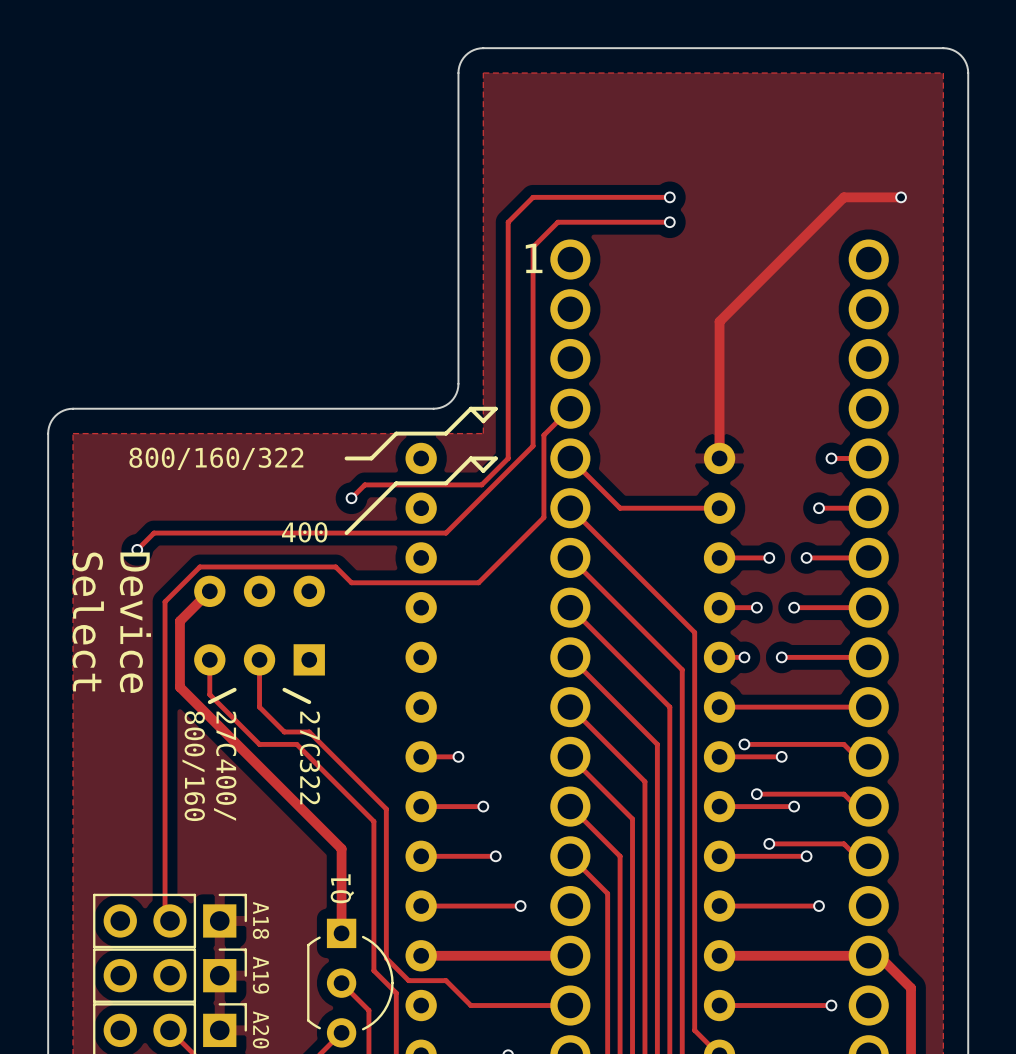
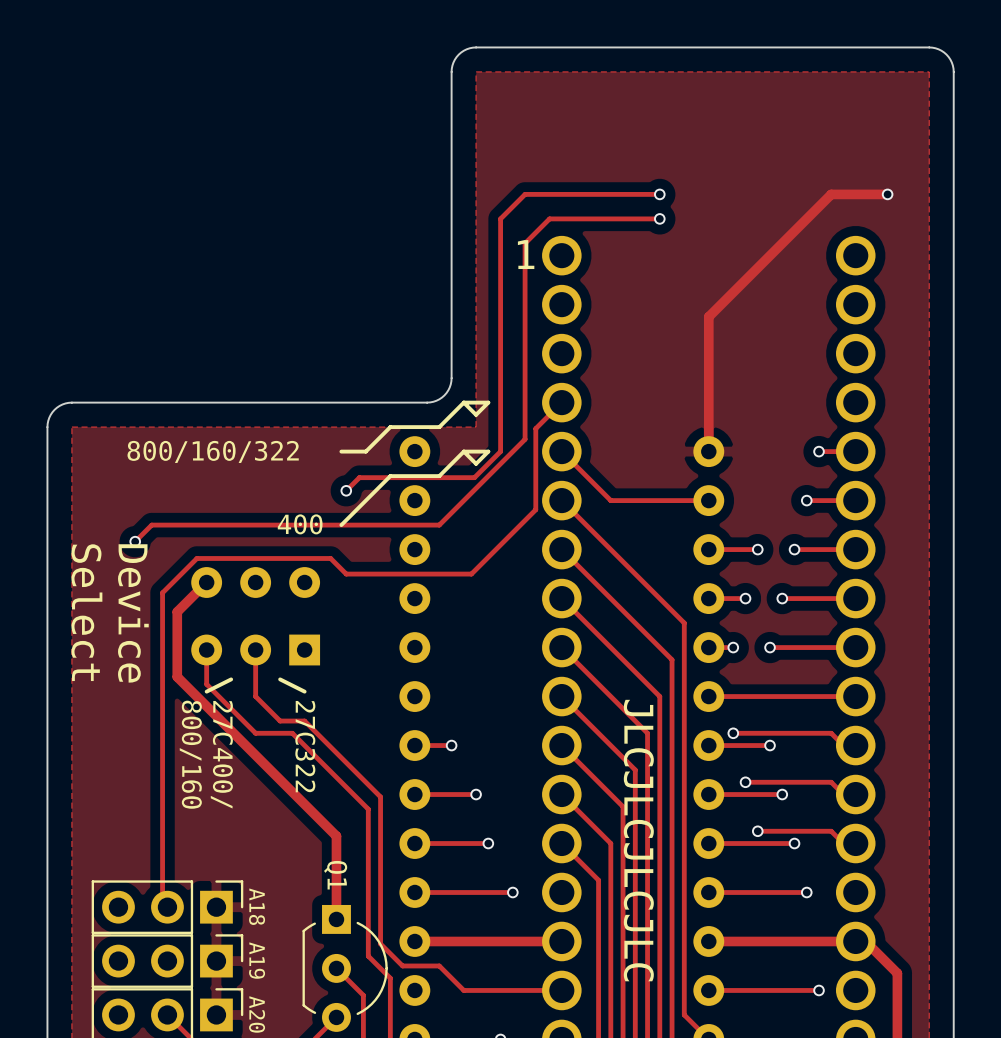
text: none -> JLCJLCJLCJLC (638, 840)
Q1 name rotation: 0° (342, 888) -> 180° (335, 875)

